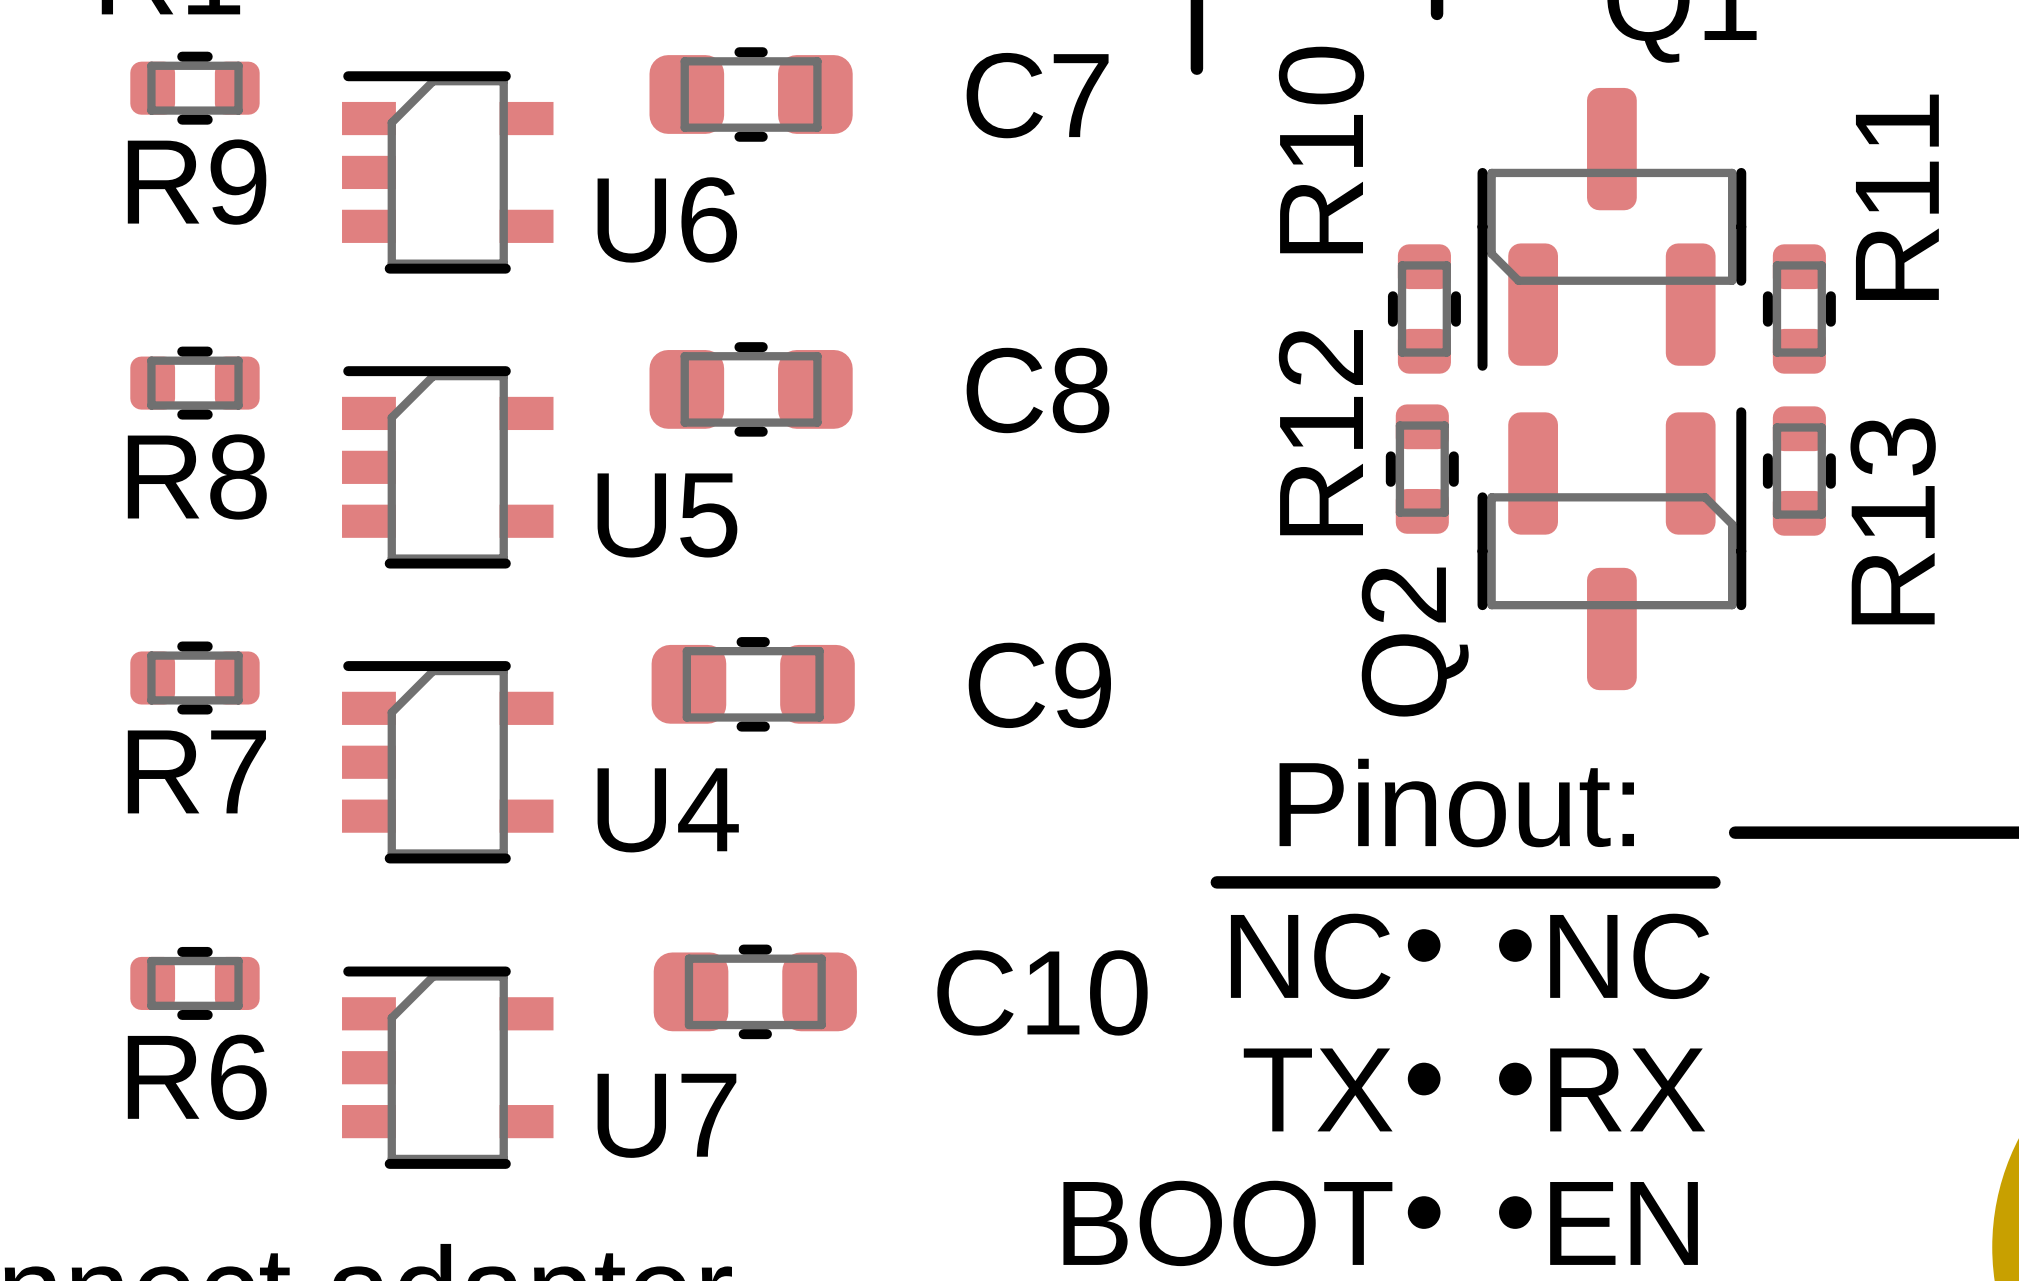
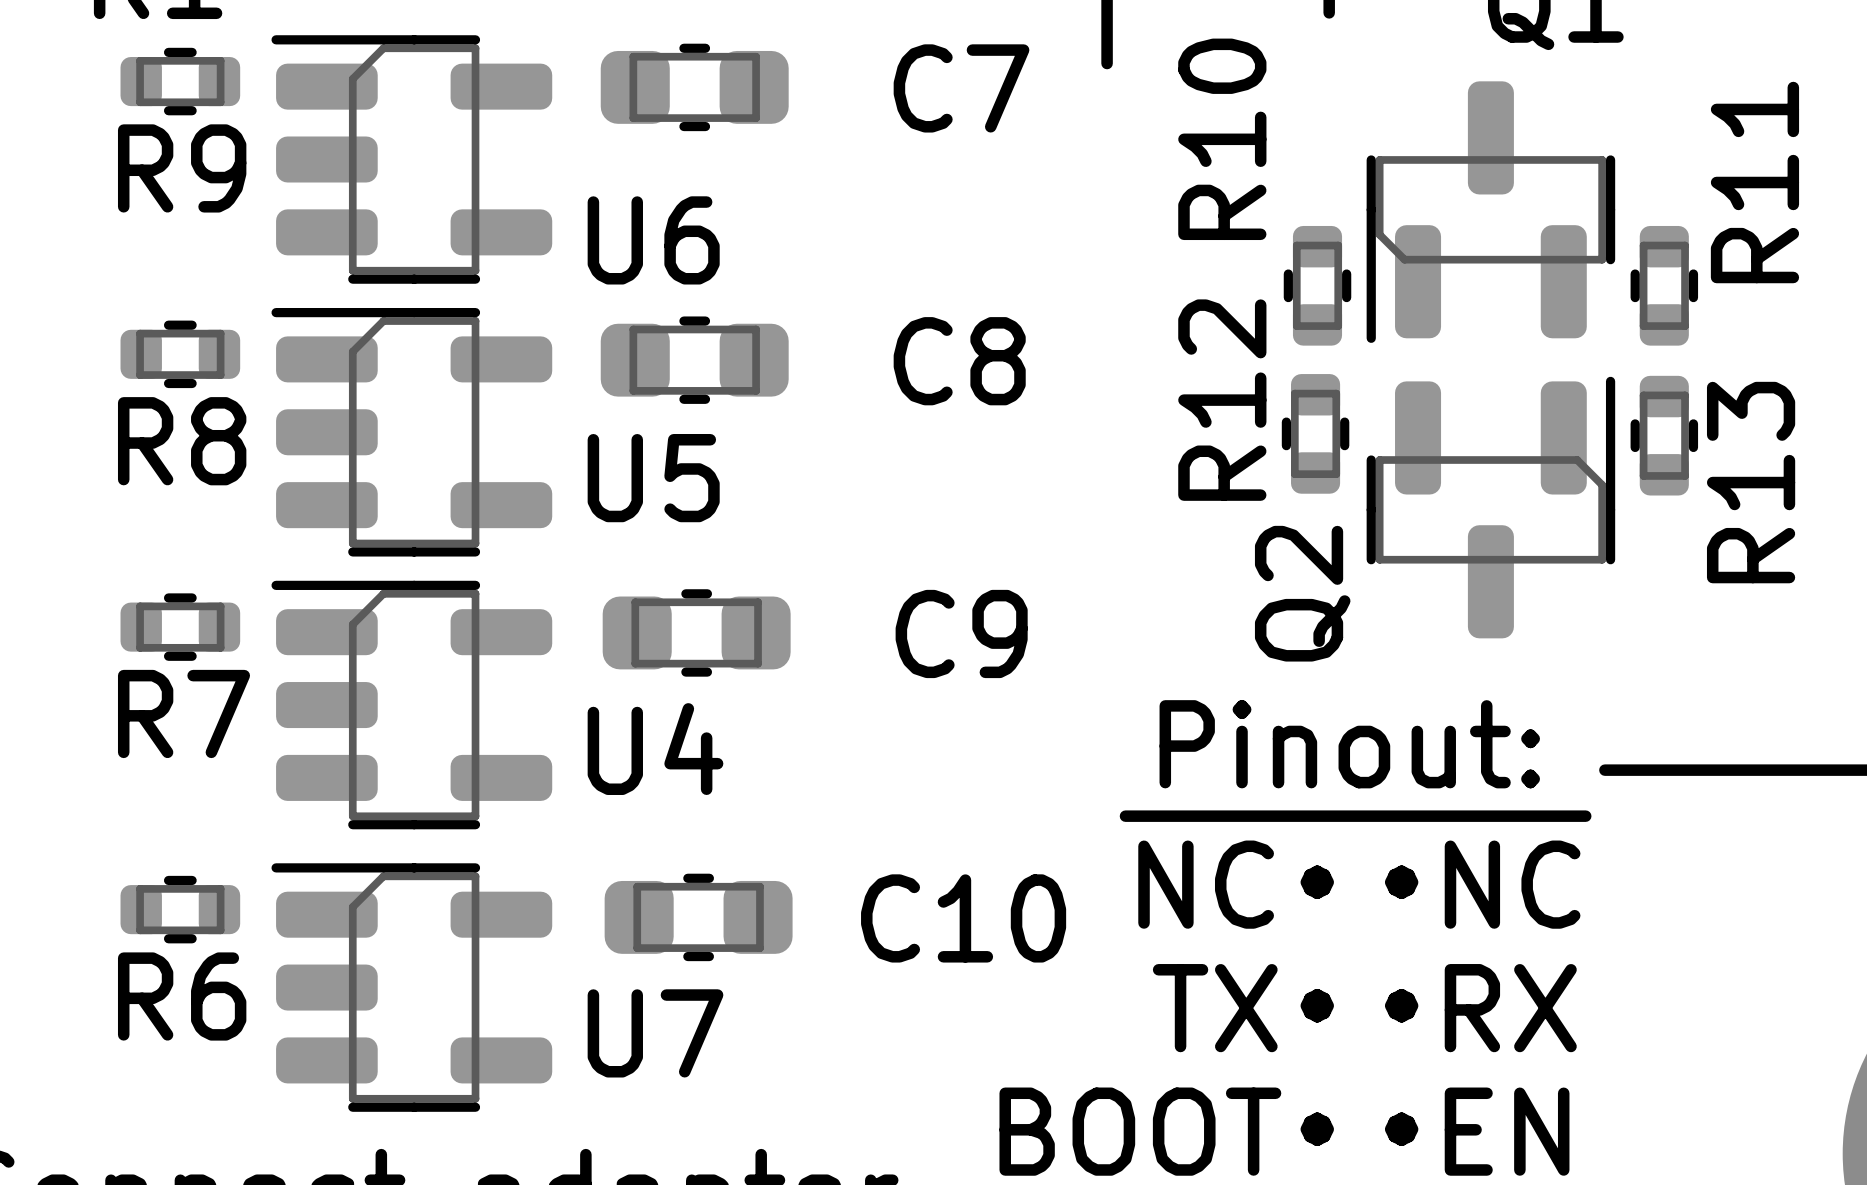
U6 footprint: [342, 71, 554, 274] -> [271, 35, 553, 284]
U6 name position: U6 (667, 219) -> U6 (653, 240)
U5 footprint: [342, 366, 554, 569] -> [271, 308, 553, 557]
U5 name position: U5 (667, 515) -> U5 (653, 478)
U4 footprint: [342, 661, 554, 864] -> [271, 580, 553, 830]
U4 name position: U4 (668, 810) -> U4 (655, 749)
U7 footprint: [342, 966, 554, 1169] -> [271, 863, 553, 1112]
U7 name position: U7 (666, 1115) -> U7 (655, 1033)

